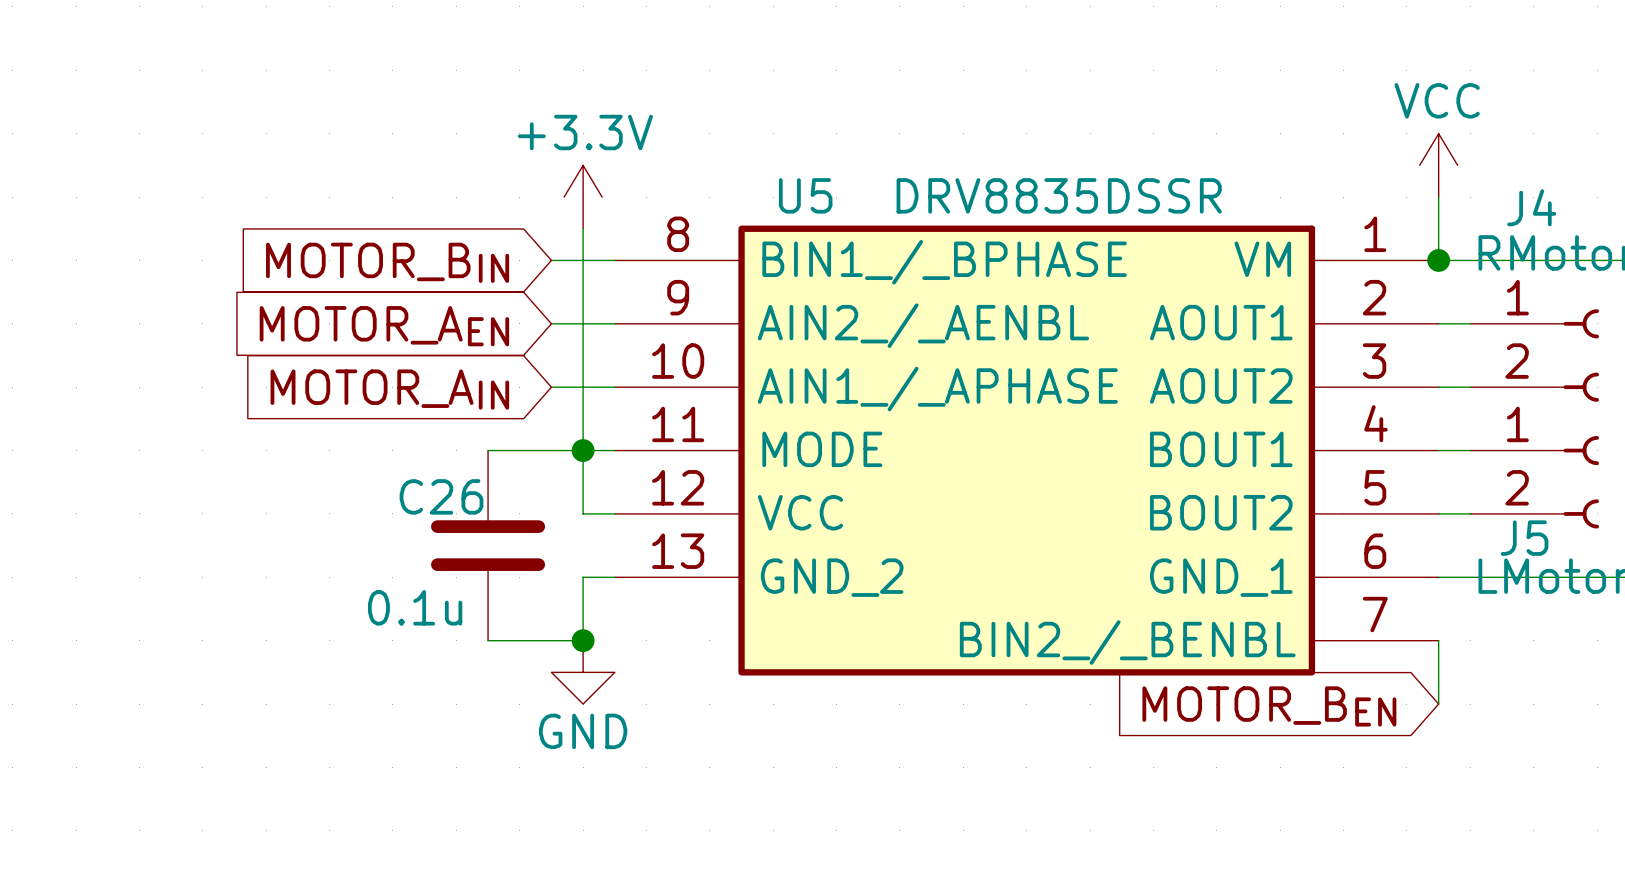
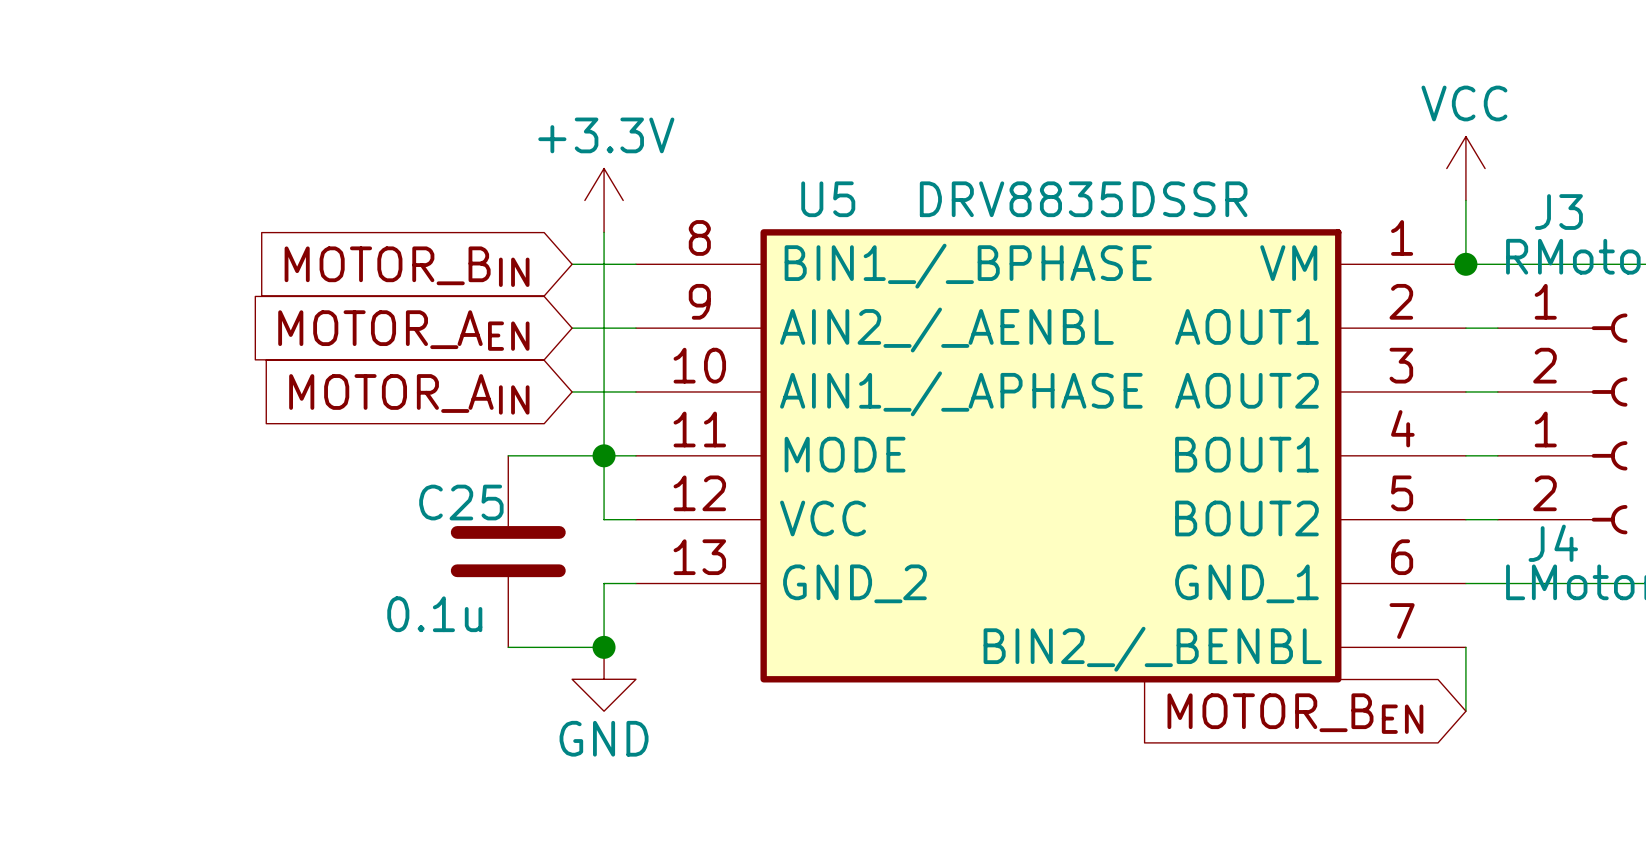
J4 name: J4 (1531, 207) -> J3 (1558, 212)
C26 name: C26 (441, 496) -> C25 (461, 502)
J5 name: J5 (1524, 538) -> J4 (1553, 543)

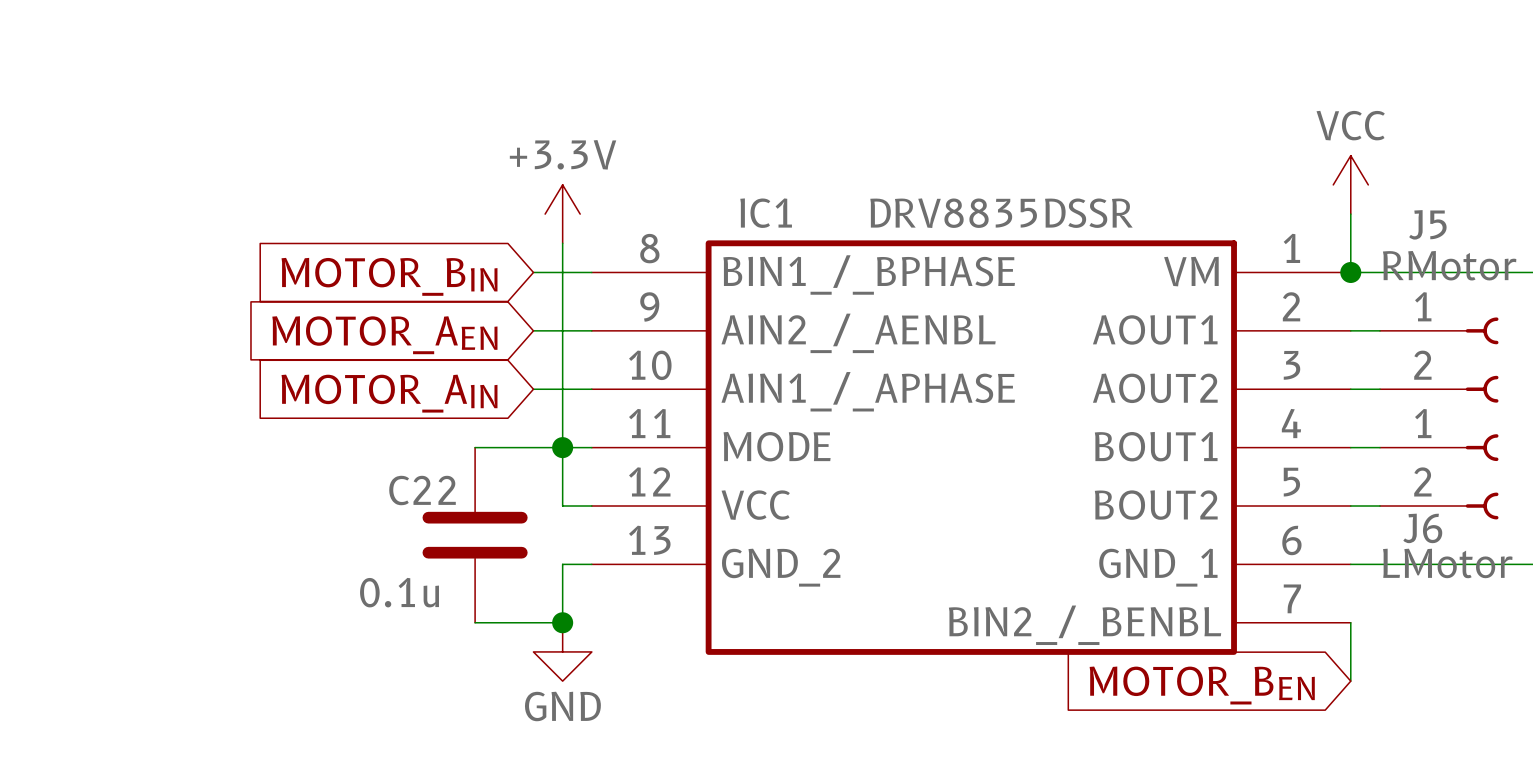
U5 name: U5 (828, 199) -> IC1 (766, 213)
J3 name: J3 (1558, 212) -> J5 (1427, 224)
C25 name: C25 (461, 502) -> C22 (422, 490)
J4 name: J4 (1553, 543) -> J6 (1422, 528)

